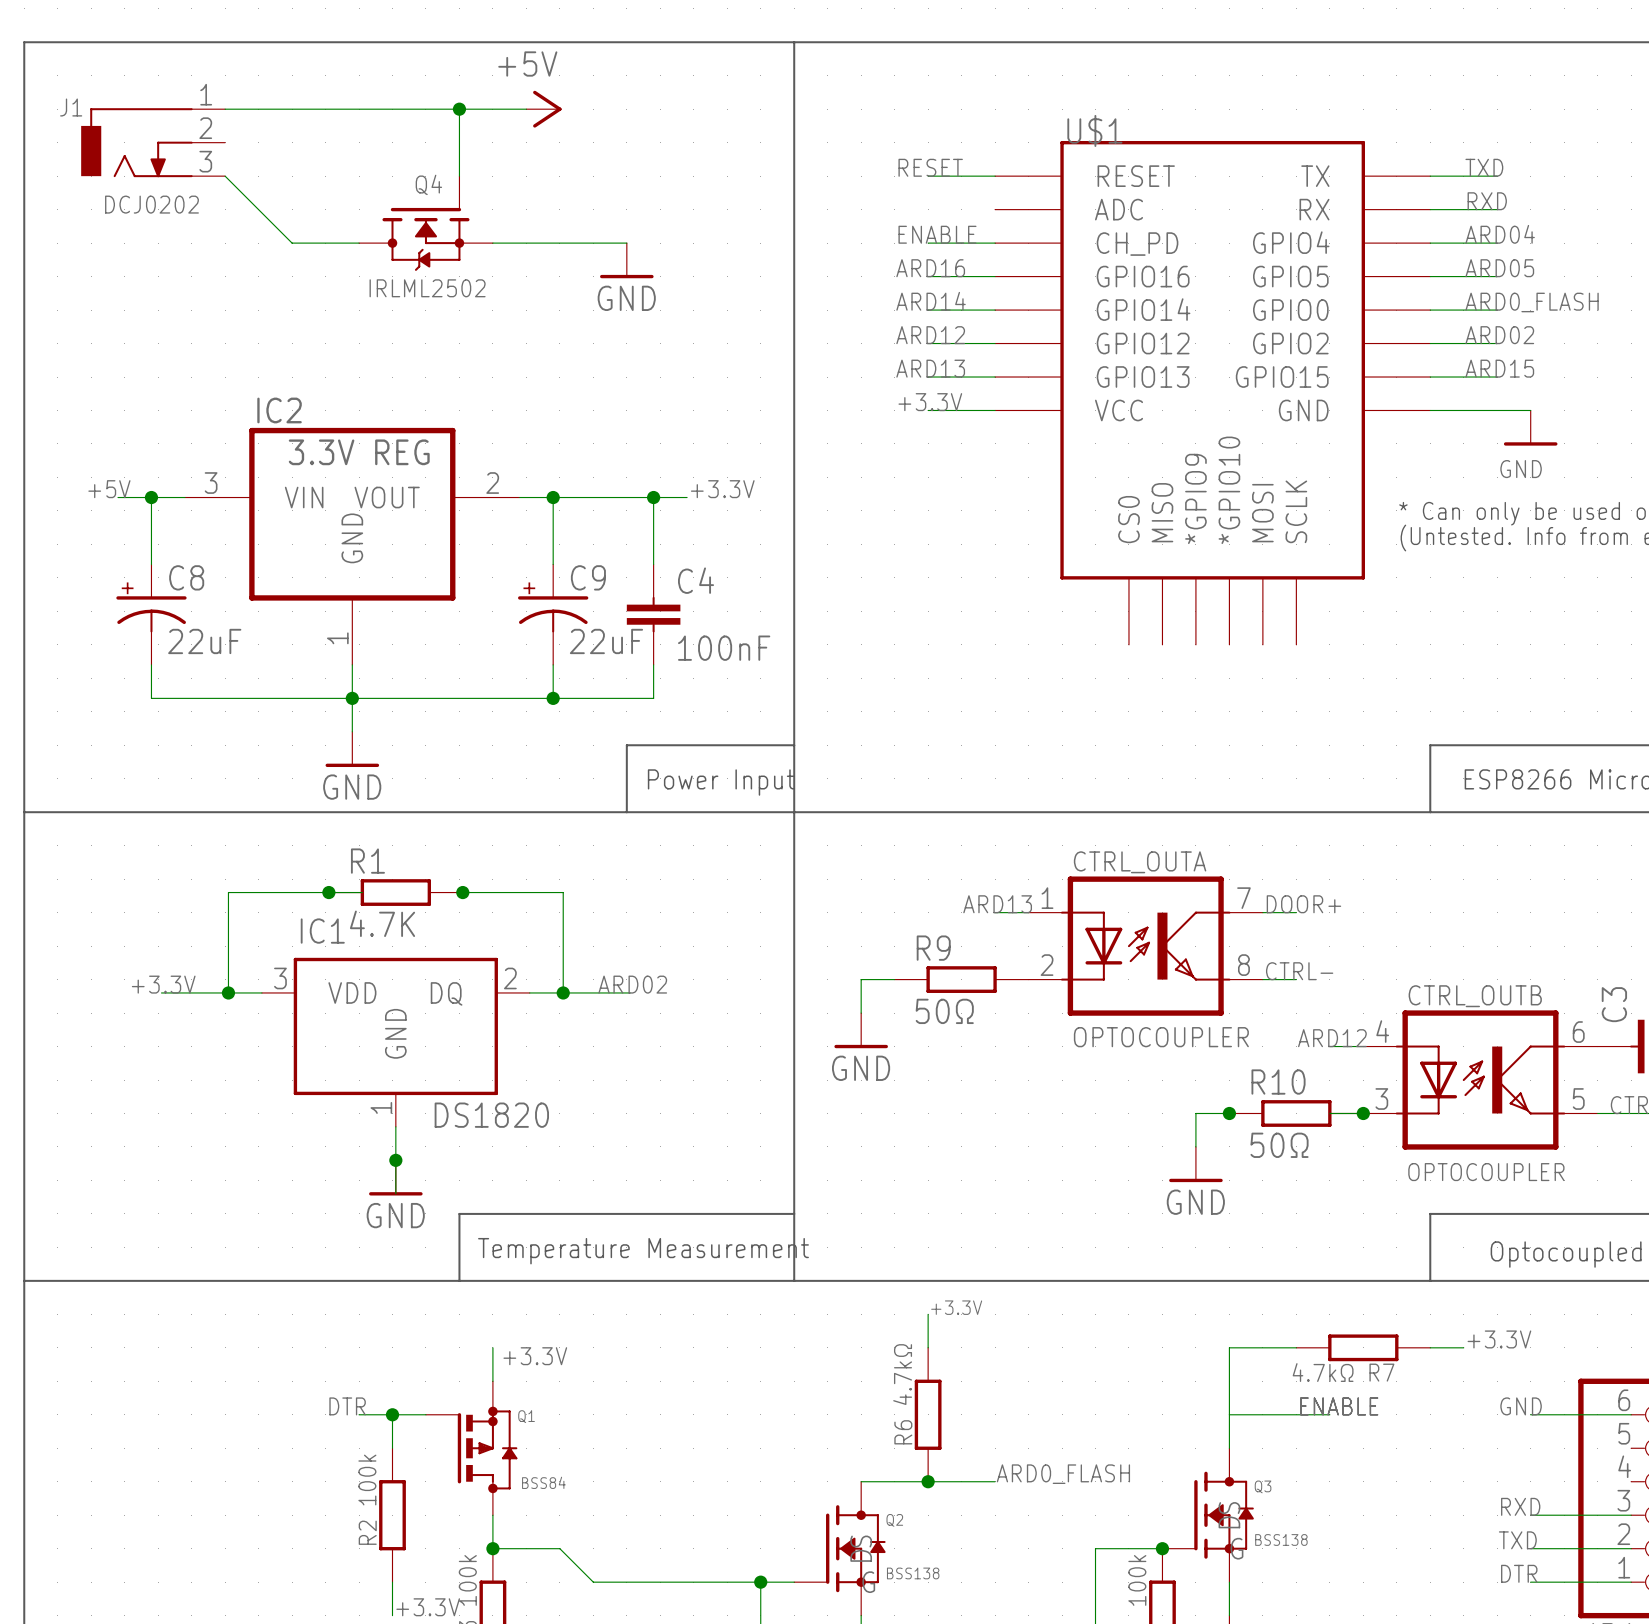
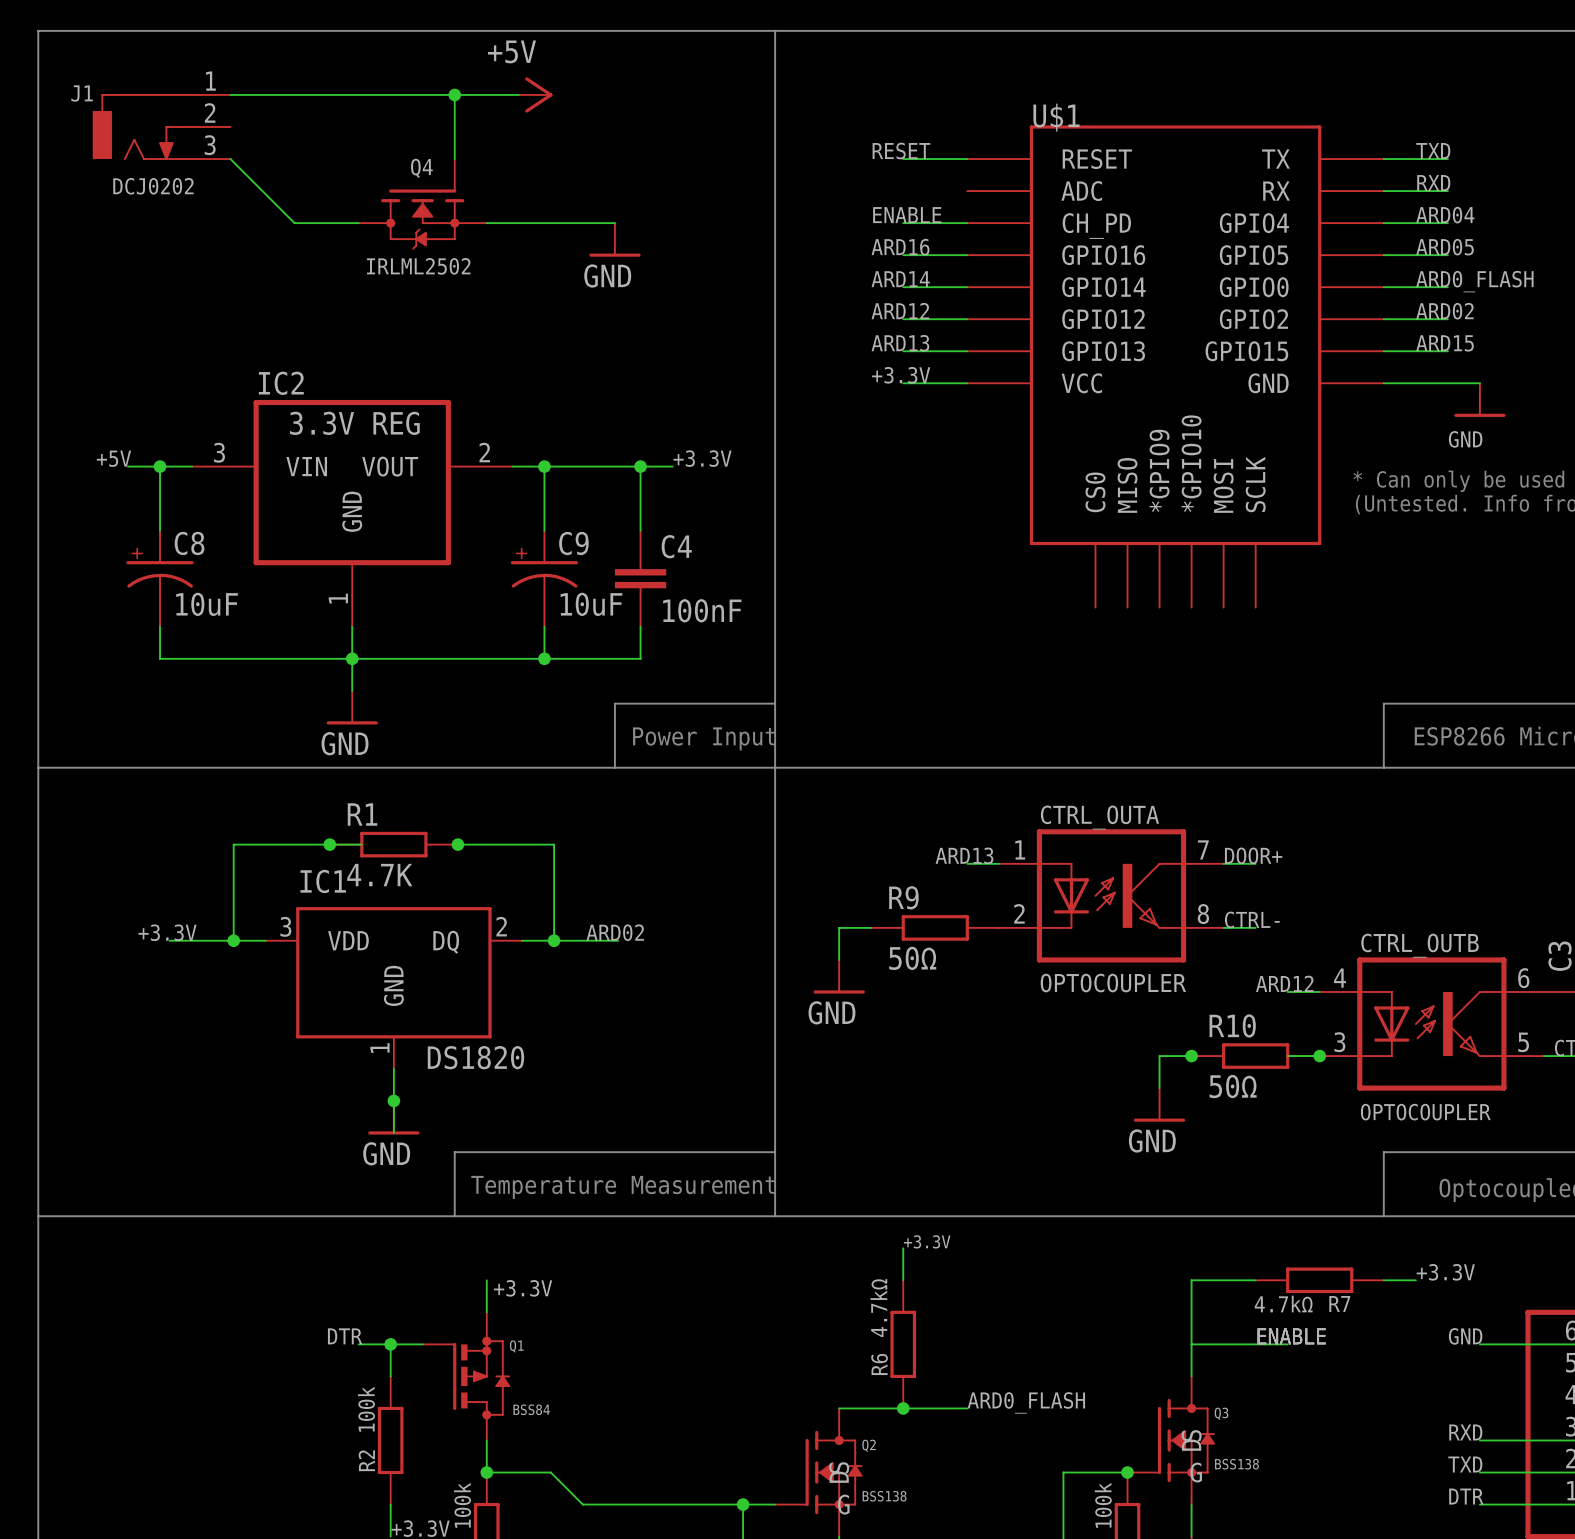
C8 value: 22uF (204, 641) -> 10uF (207, 604)
C9 value: 22uF (606, 641) -> 10uF (591, 604)

